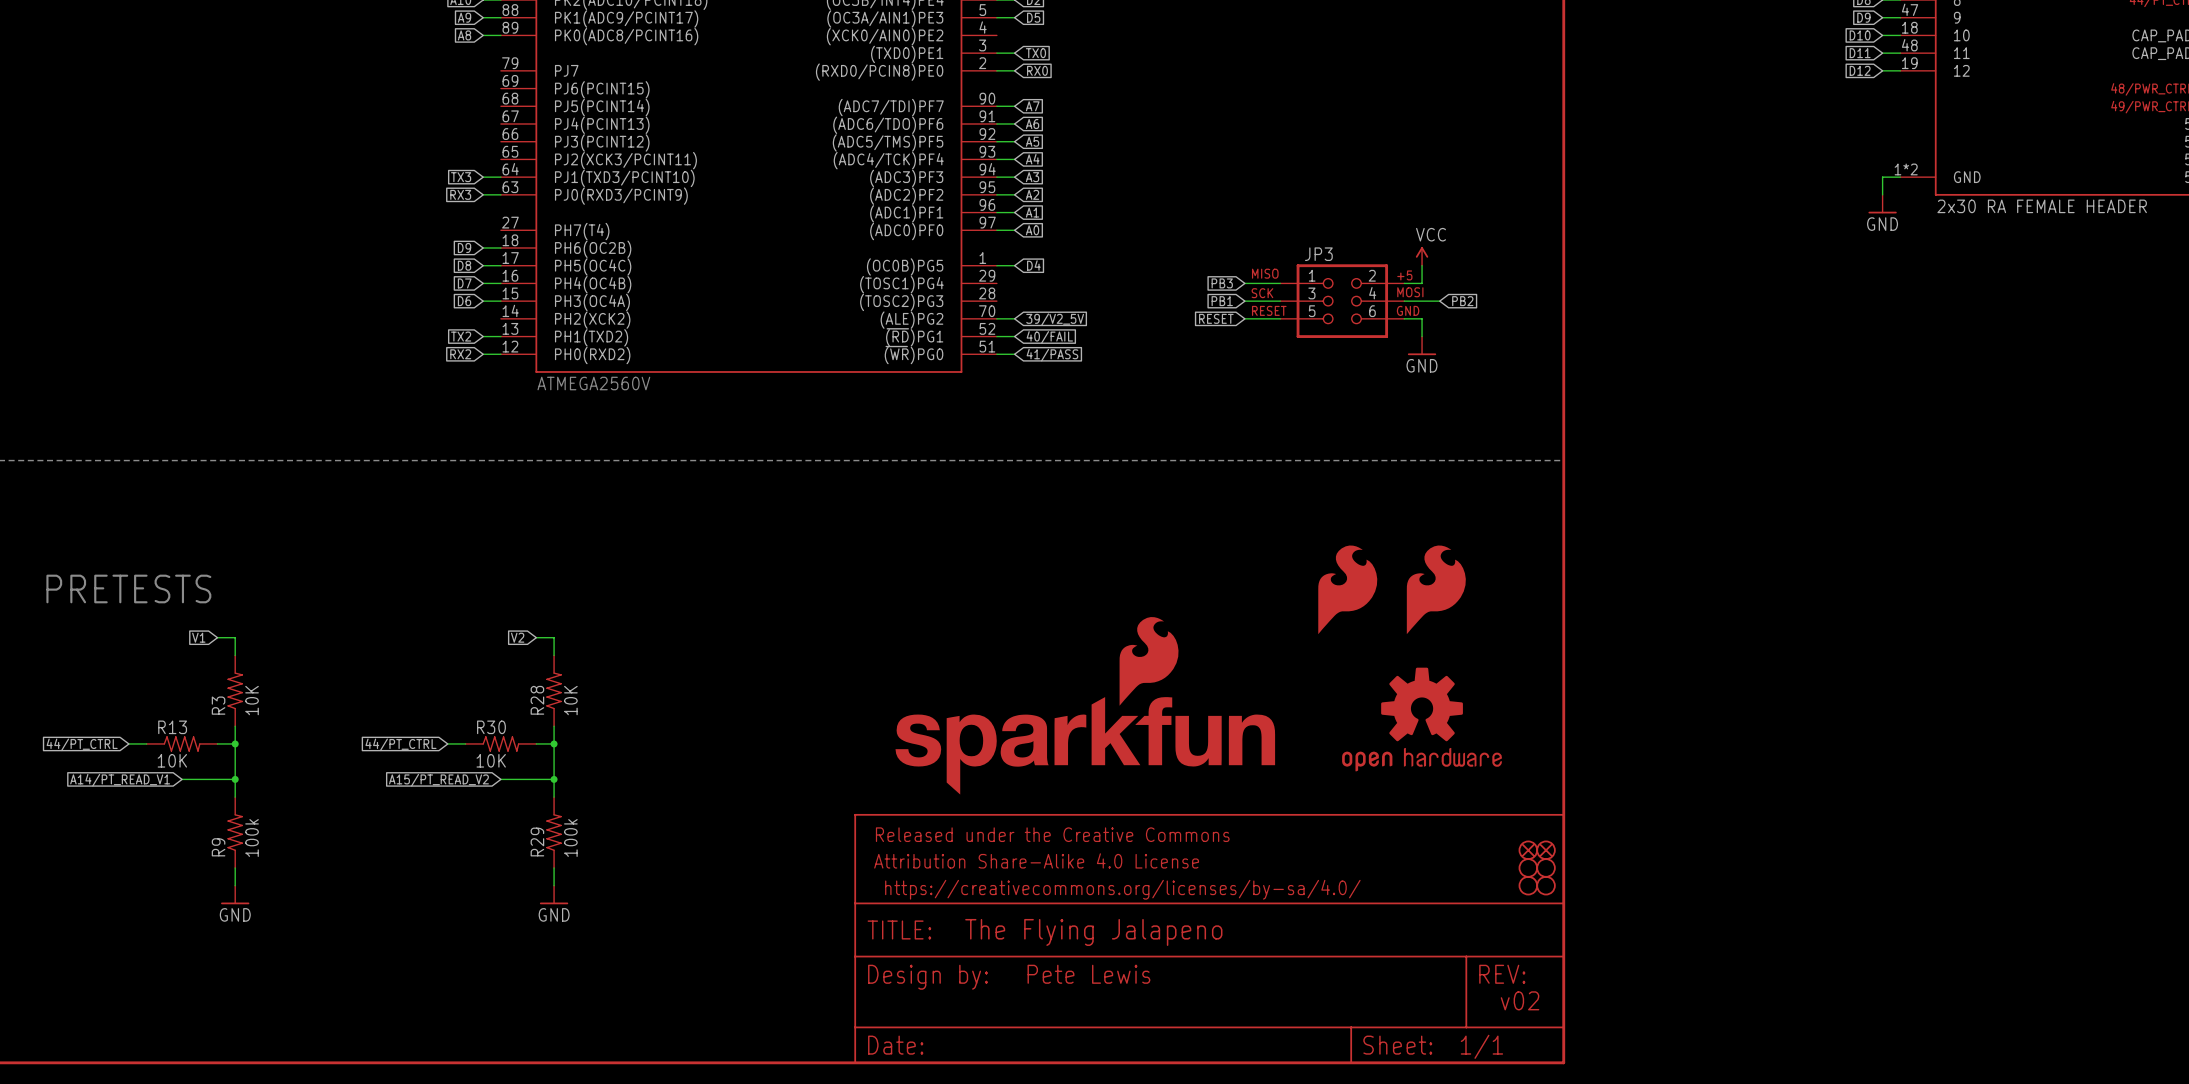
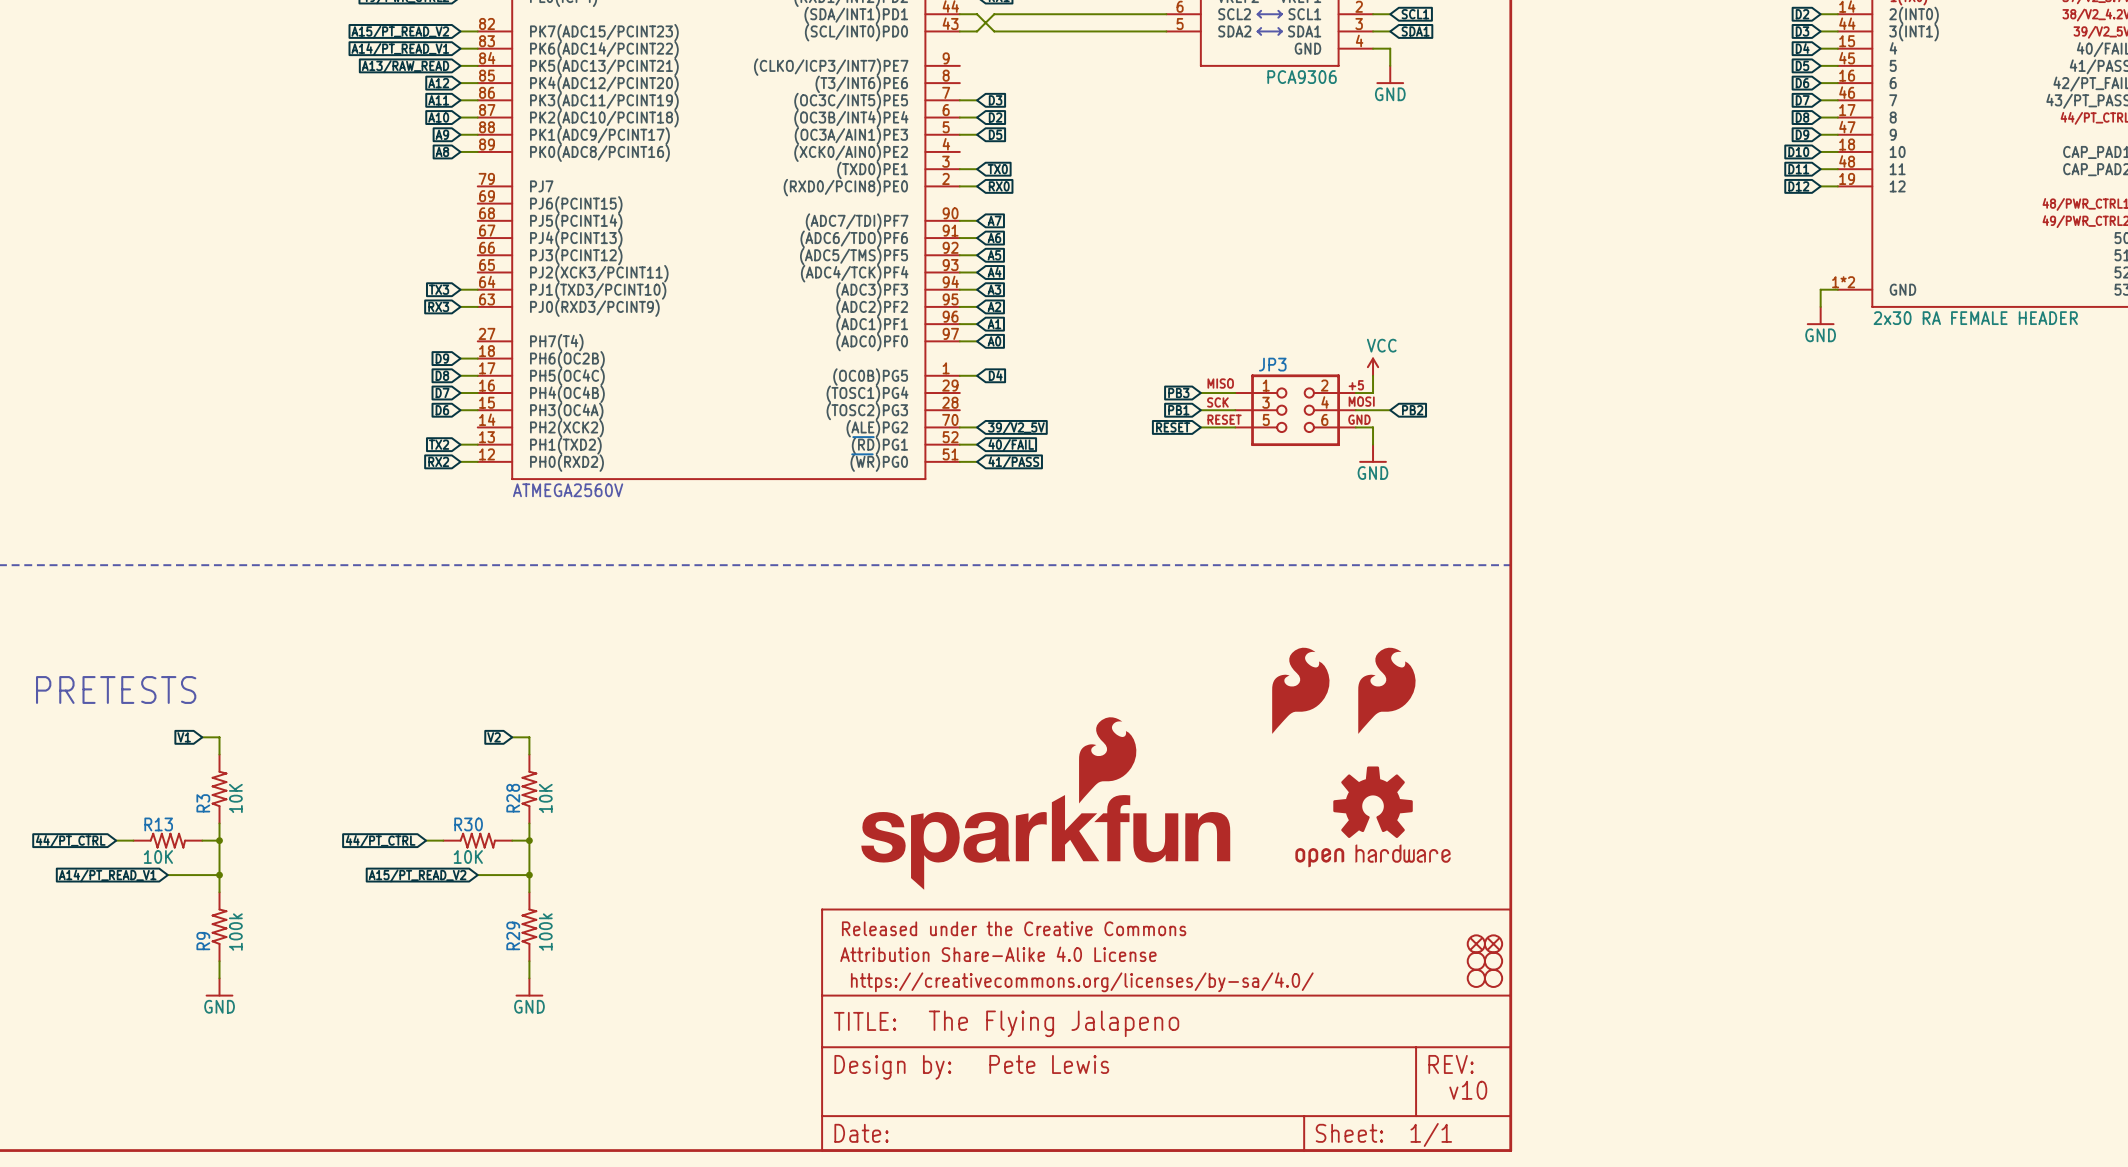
text: v02 (1520, 1000) -> v10 (1468, 1090)

